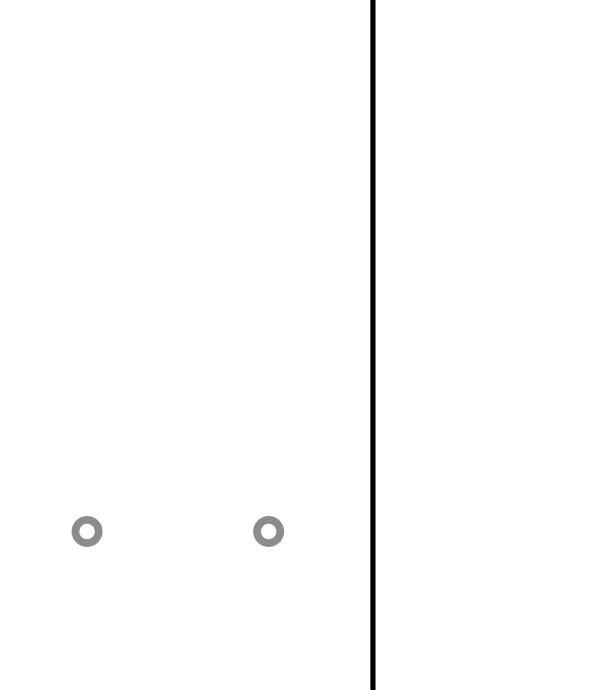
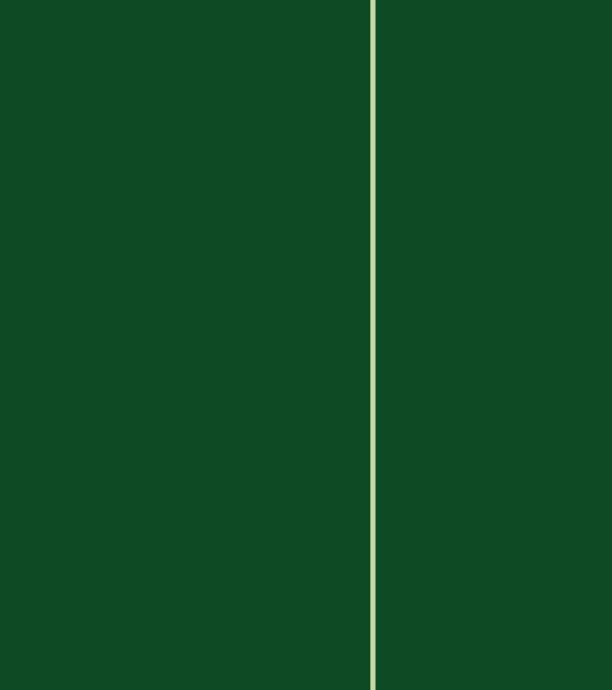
via: (87, 531) -> none
via: (268, 531) -> none

